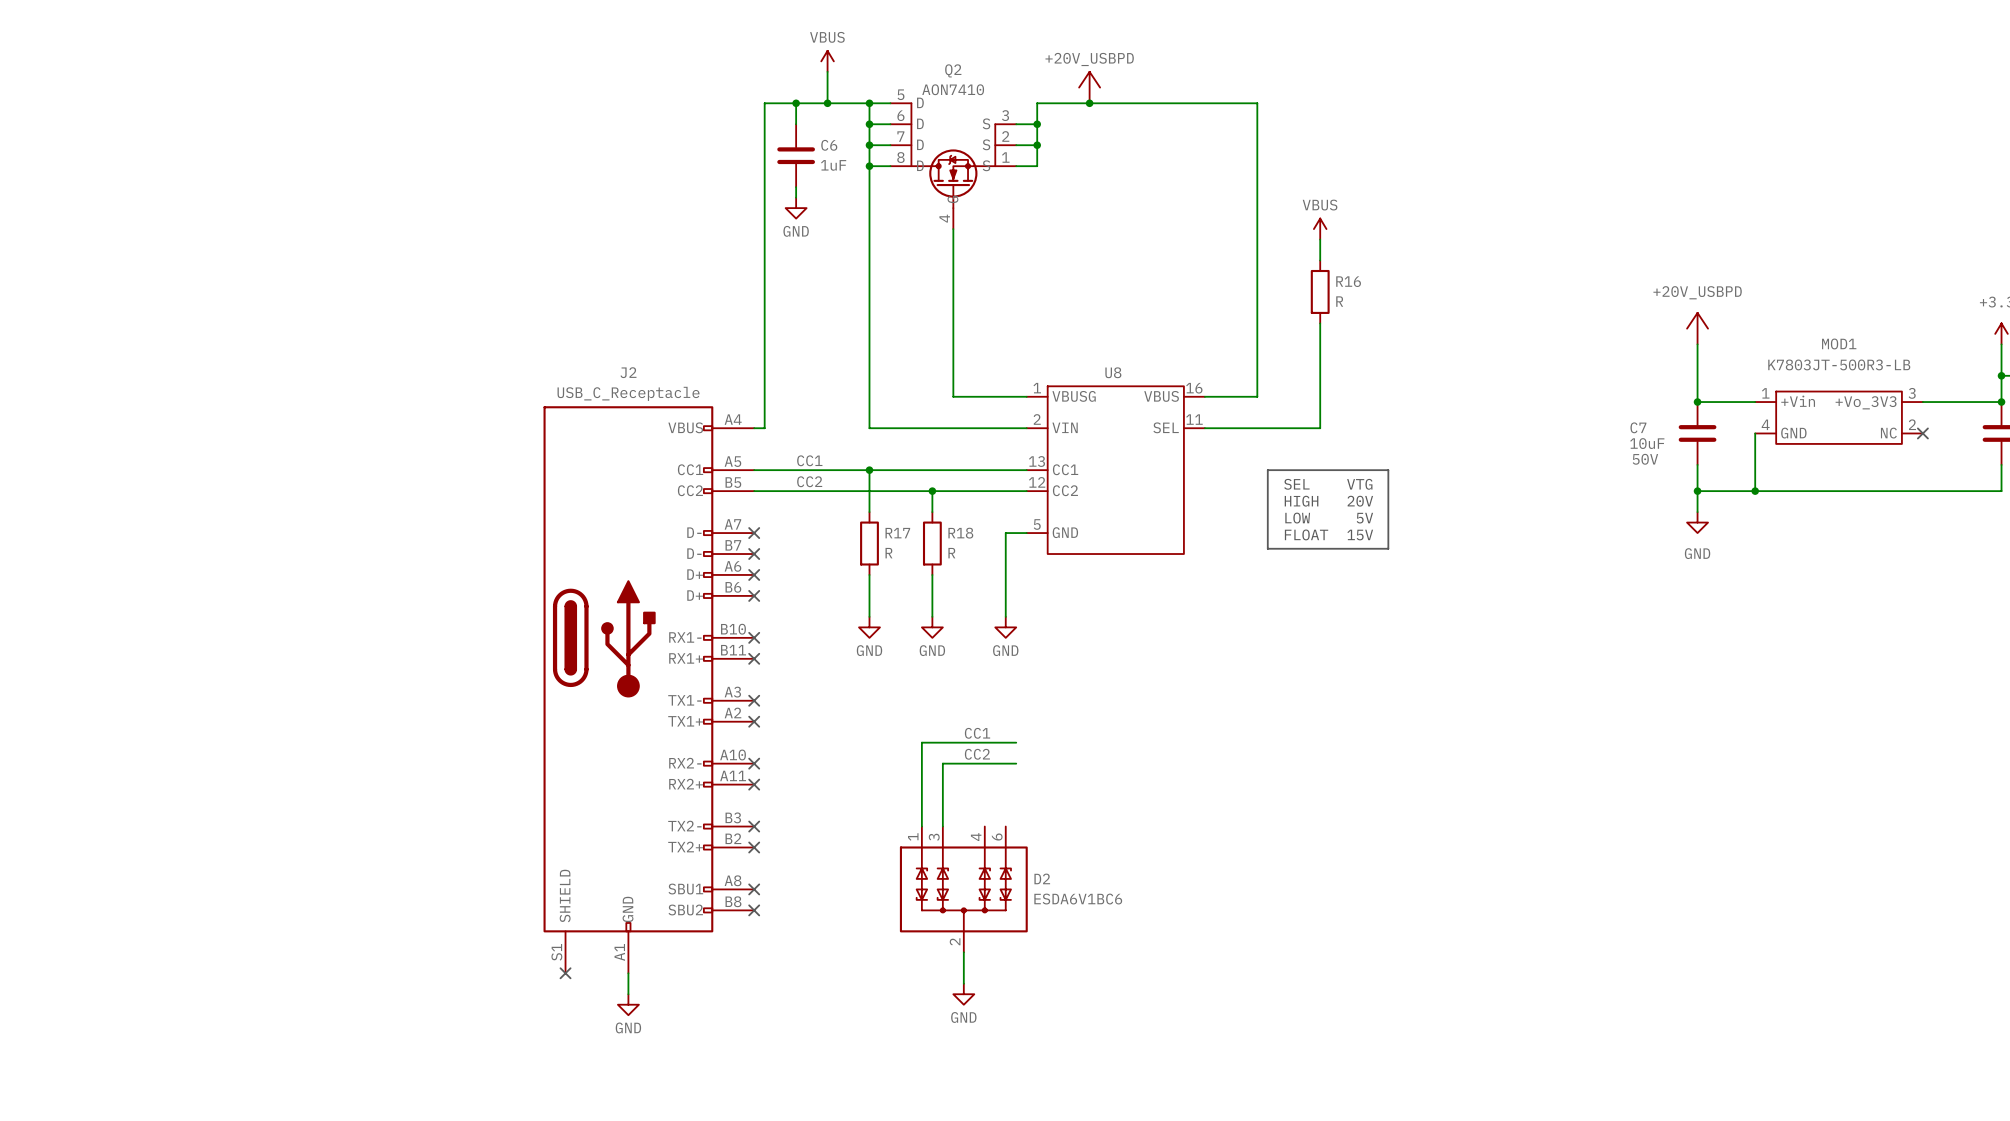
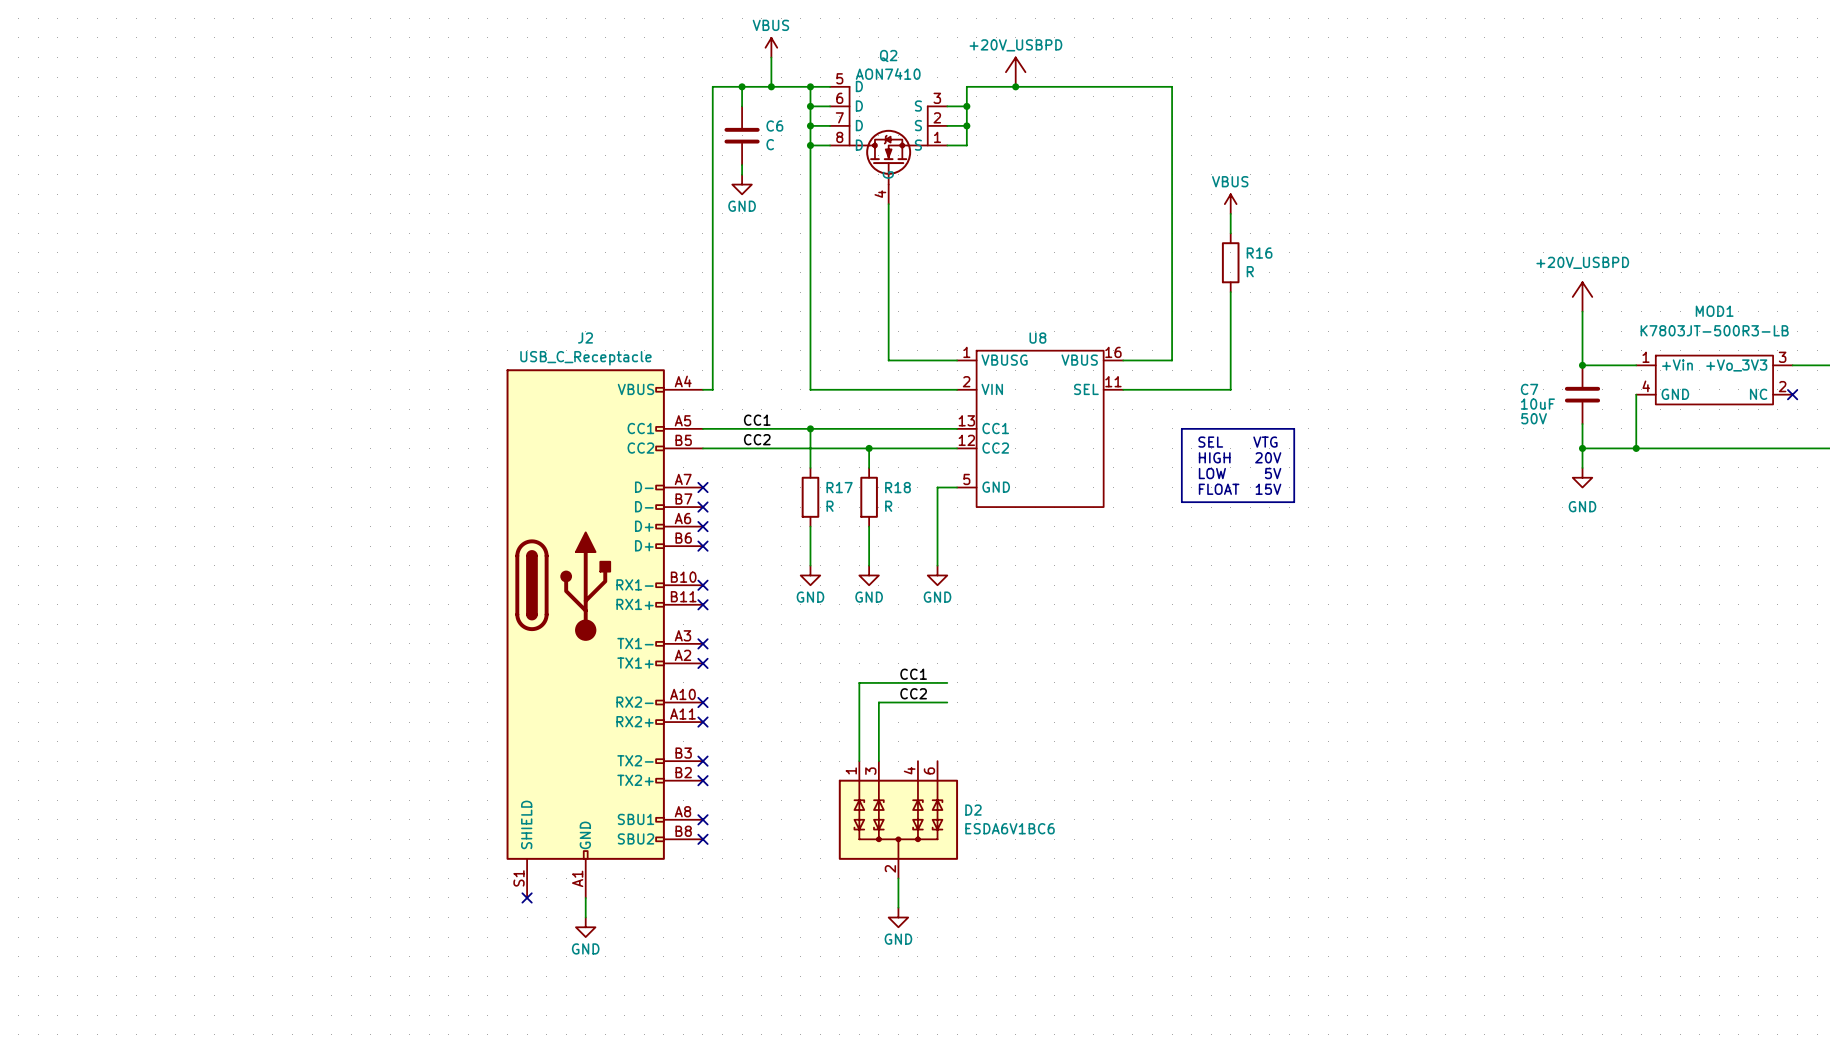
C6 value: 1uF (833, 165) -> C (770, 144)

